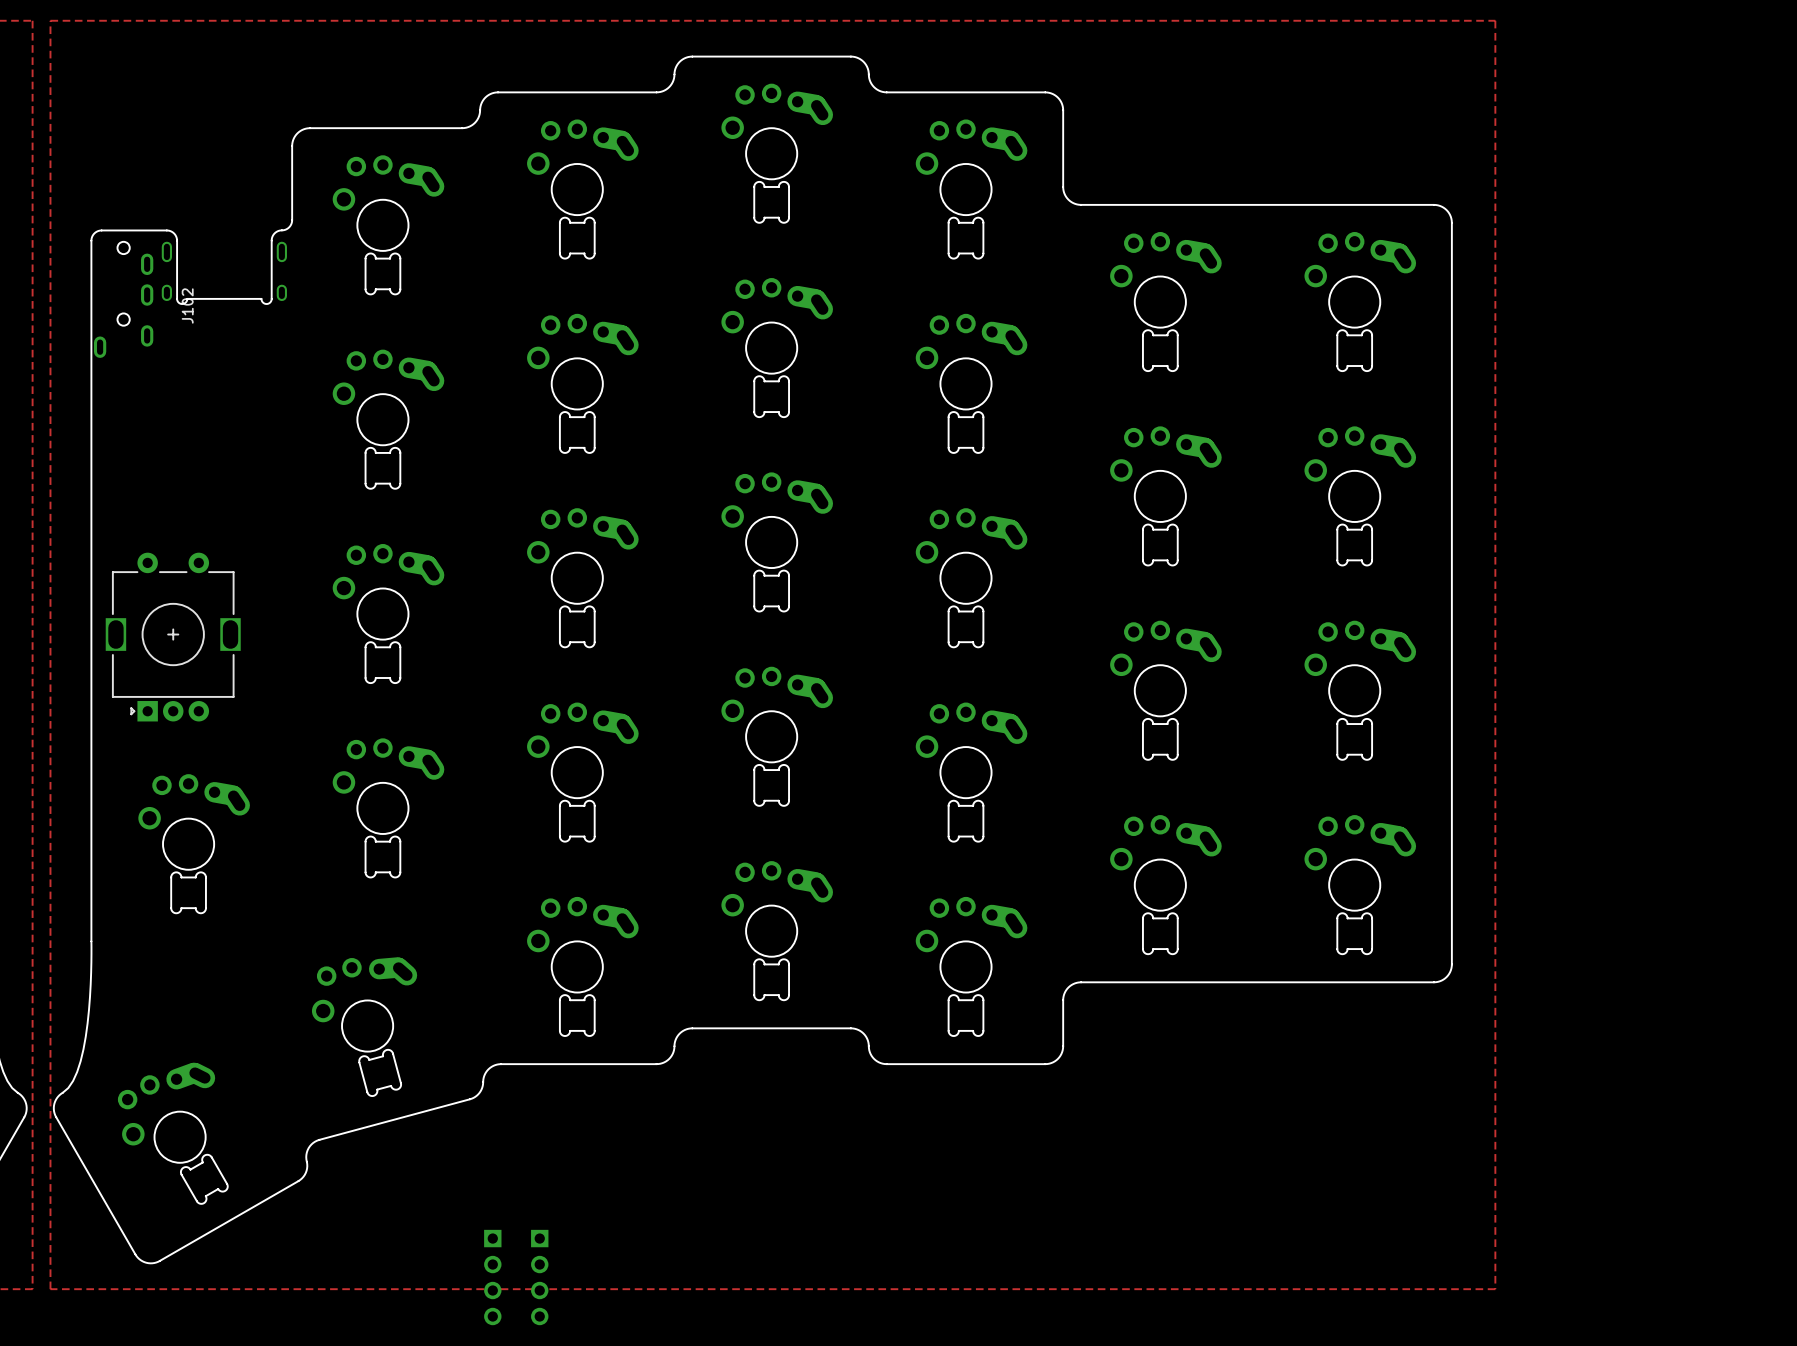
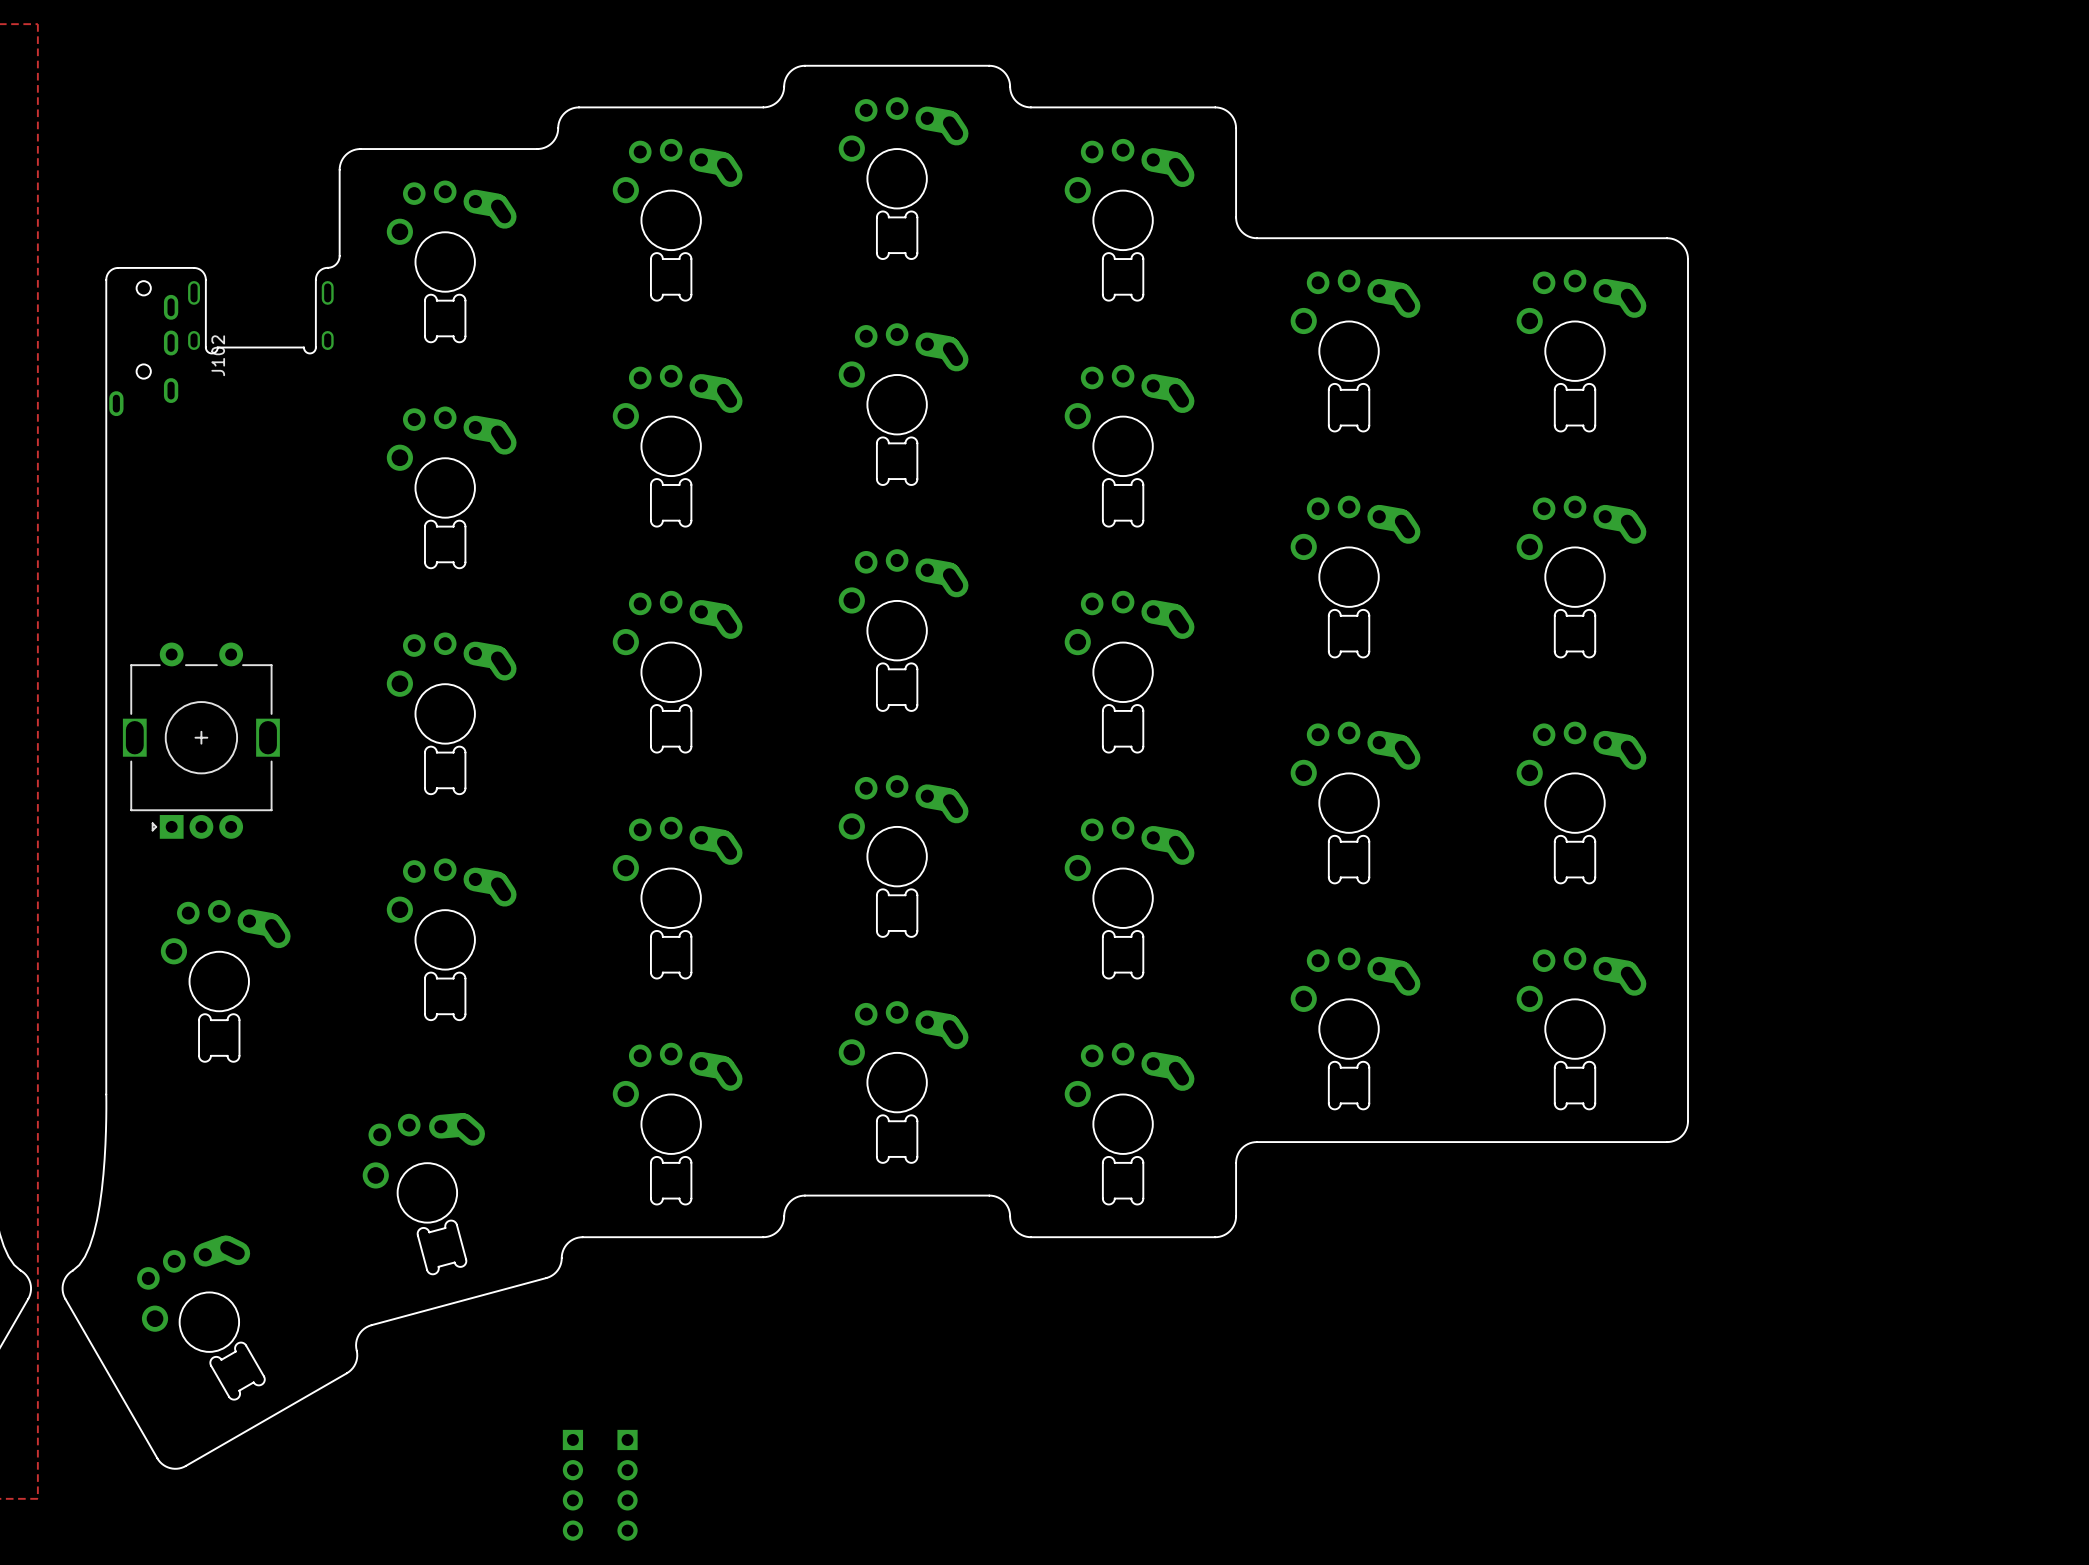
zone outline: (50, 20) (1495, 20) (1495, 1289) (50, 1289) (50, 20) -> none

